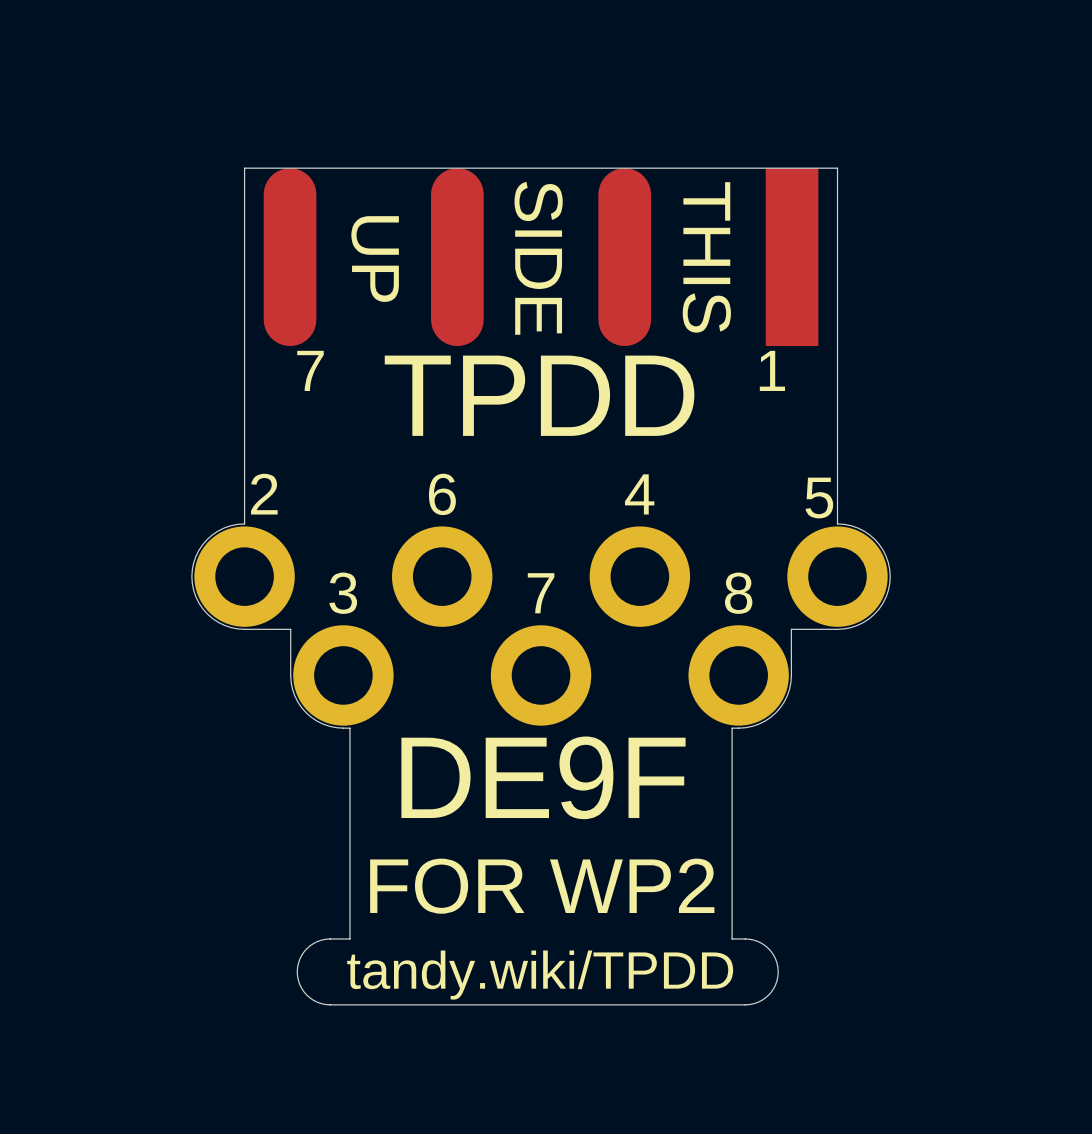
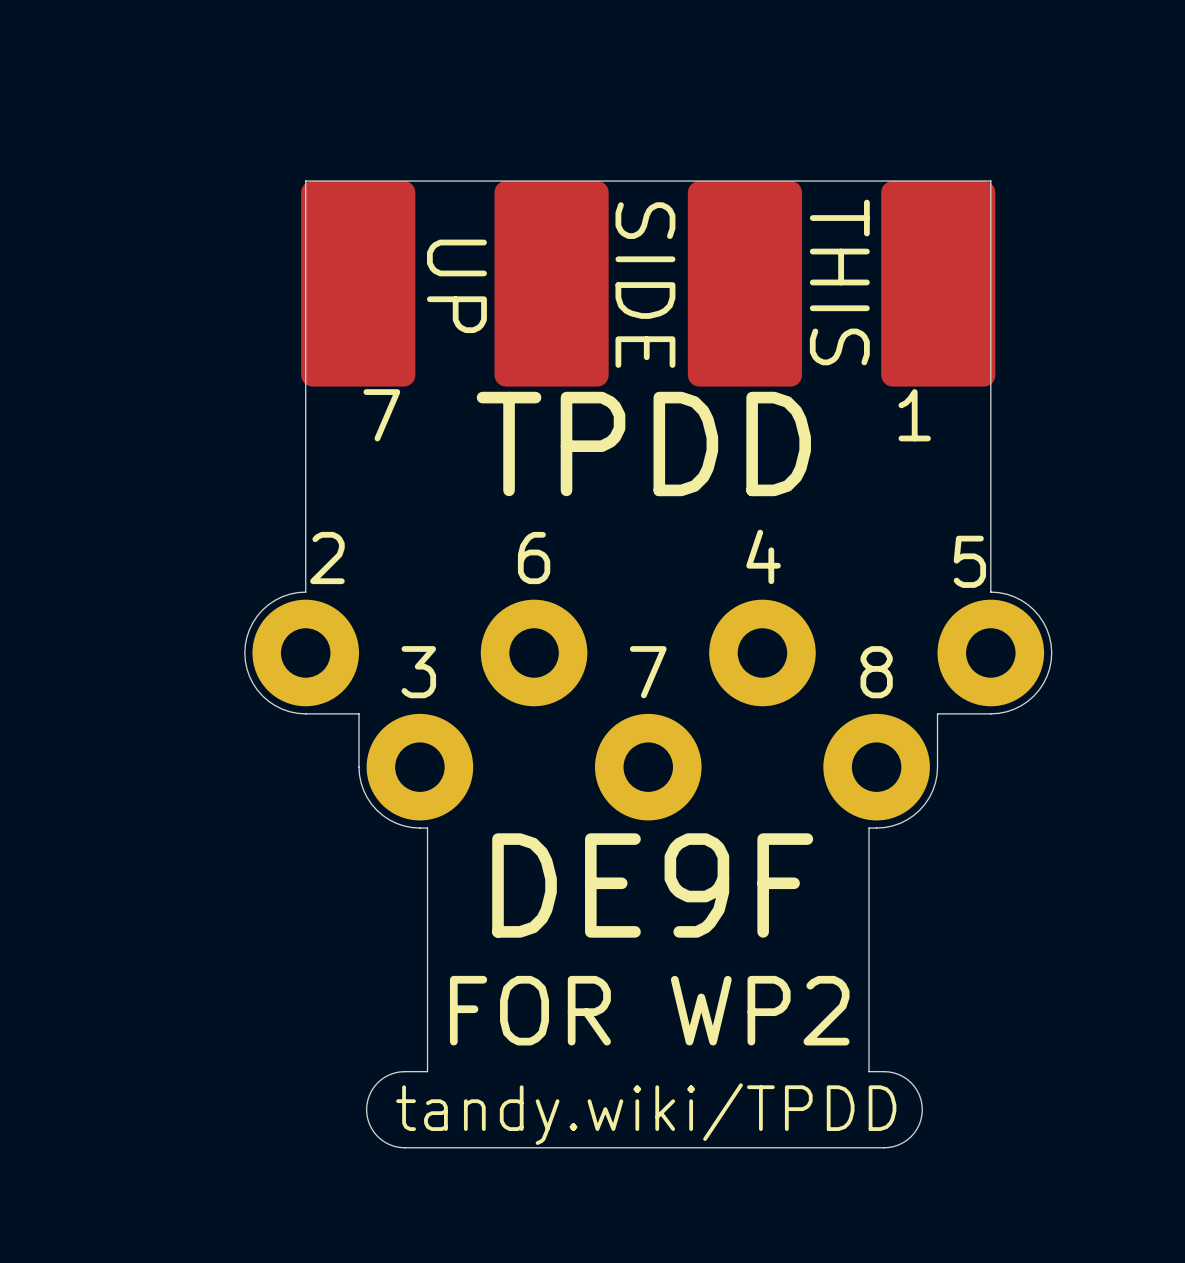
part footprint: [263, 168, 819, 347] -> [301, 181, 996, 387]
part footprint: [194, 526, 888, 726] -> [252, 599, 1045, 821]

